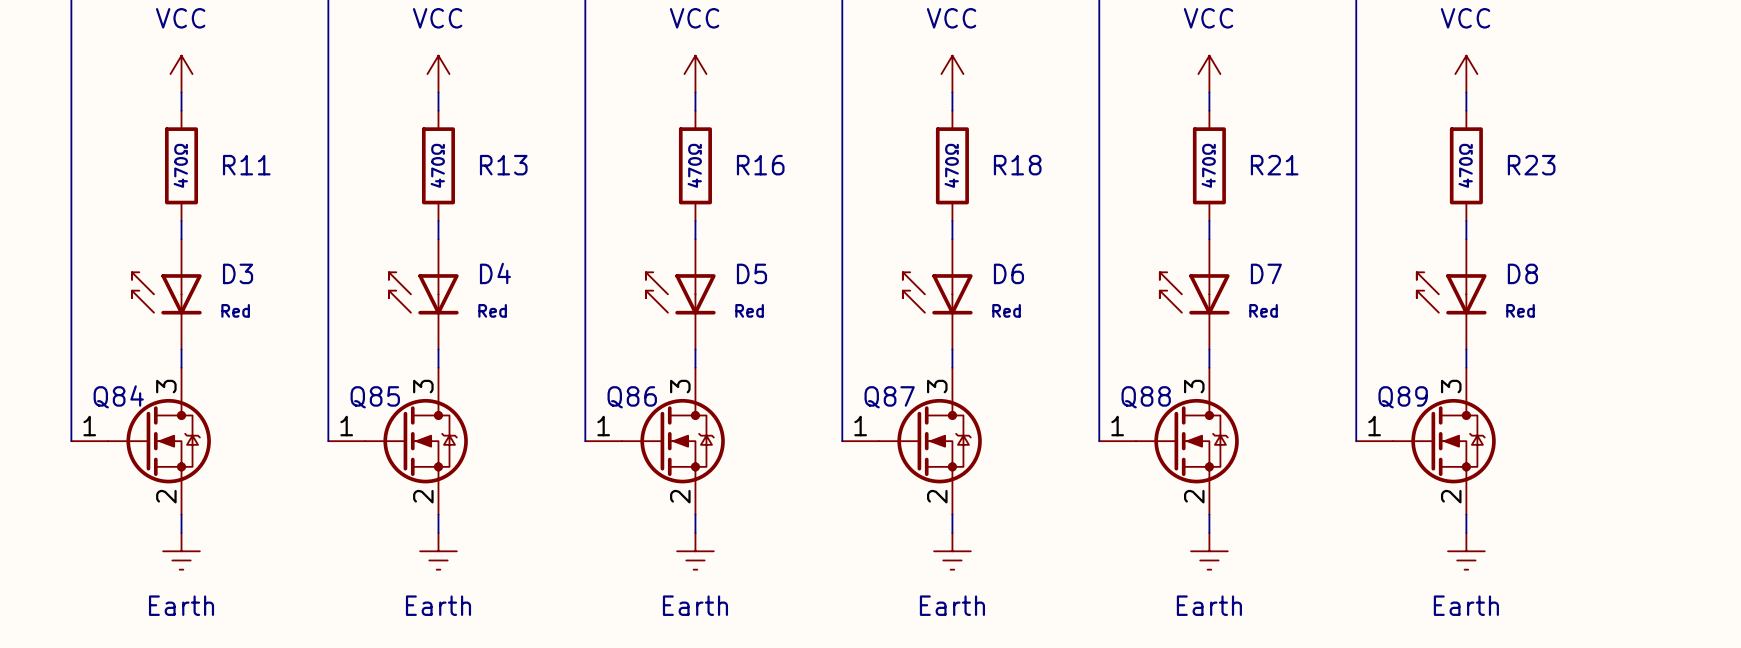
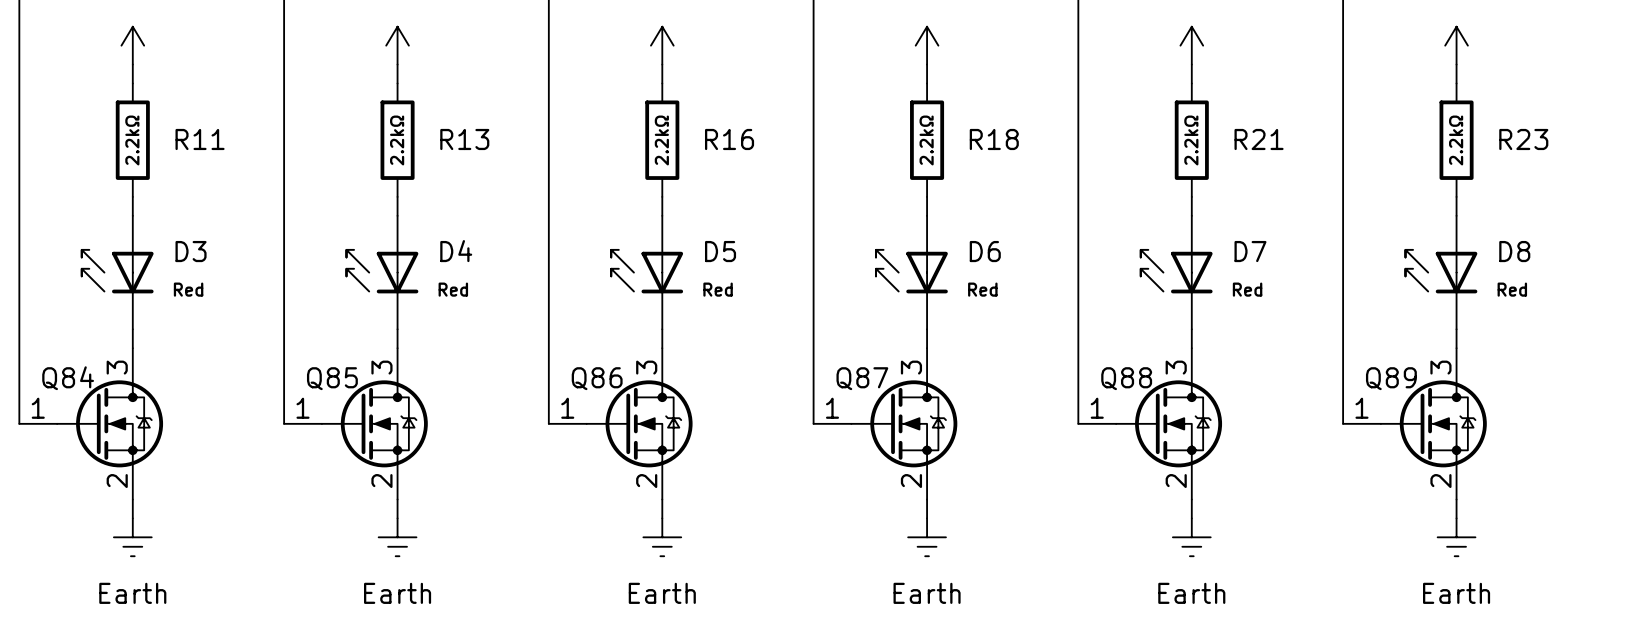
R11 value: 470Ω (180, 165) -> 2.2kΩ (132, 140)
R13 value: 470Ω (437, 165) -> 2.2kΩ (397, 140)
R16 value: 470Ω (694, 165) -> 2.2kΩ (661, 140)
R18 value: 470Ω (951, 165) -> 2.2kΩ (926, 140)
R21 value: 470Ω (1208, 165) -> 2.2kΩ (1191, 140)
R23 value: 470Ω (1465, 165) -> 2.2kΩ (1456, 140)

